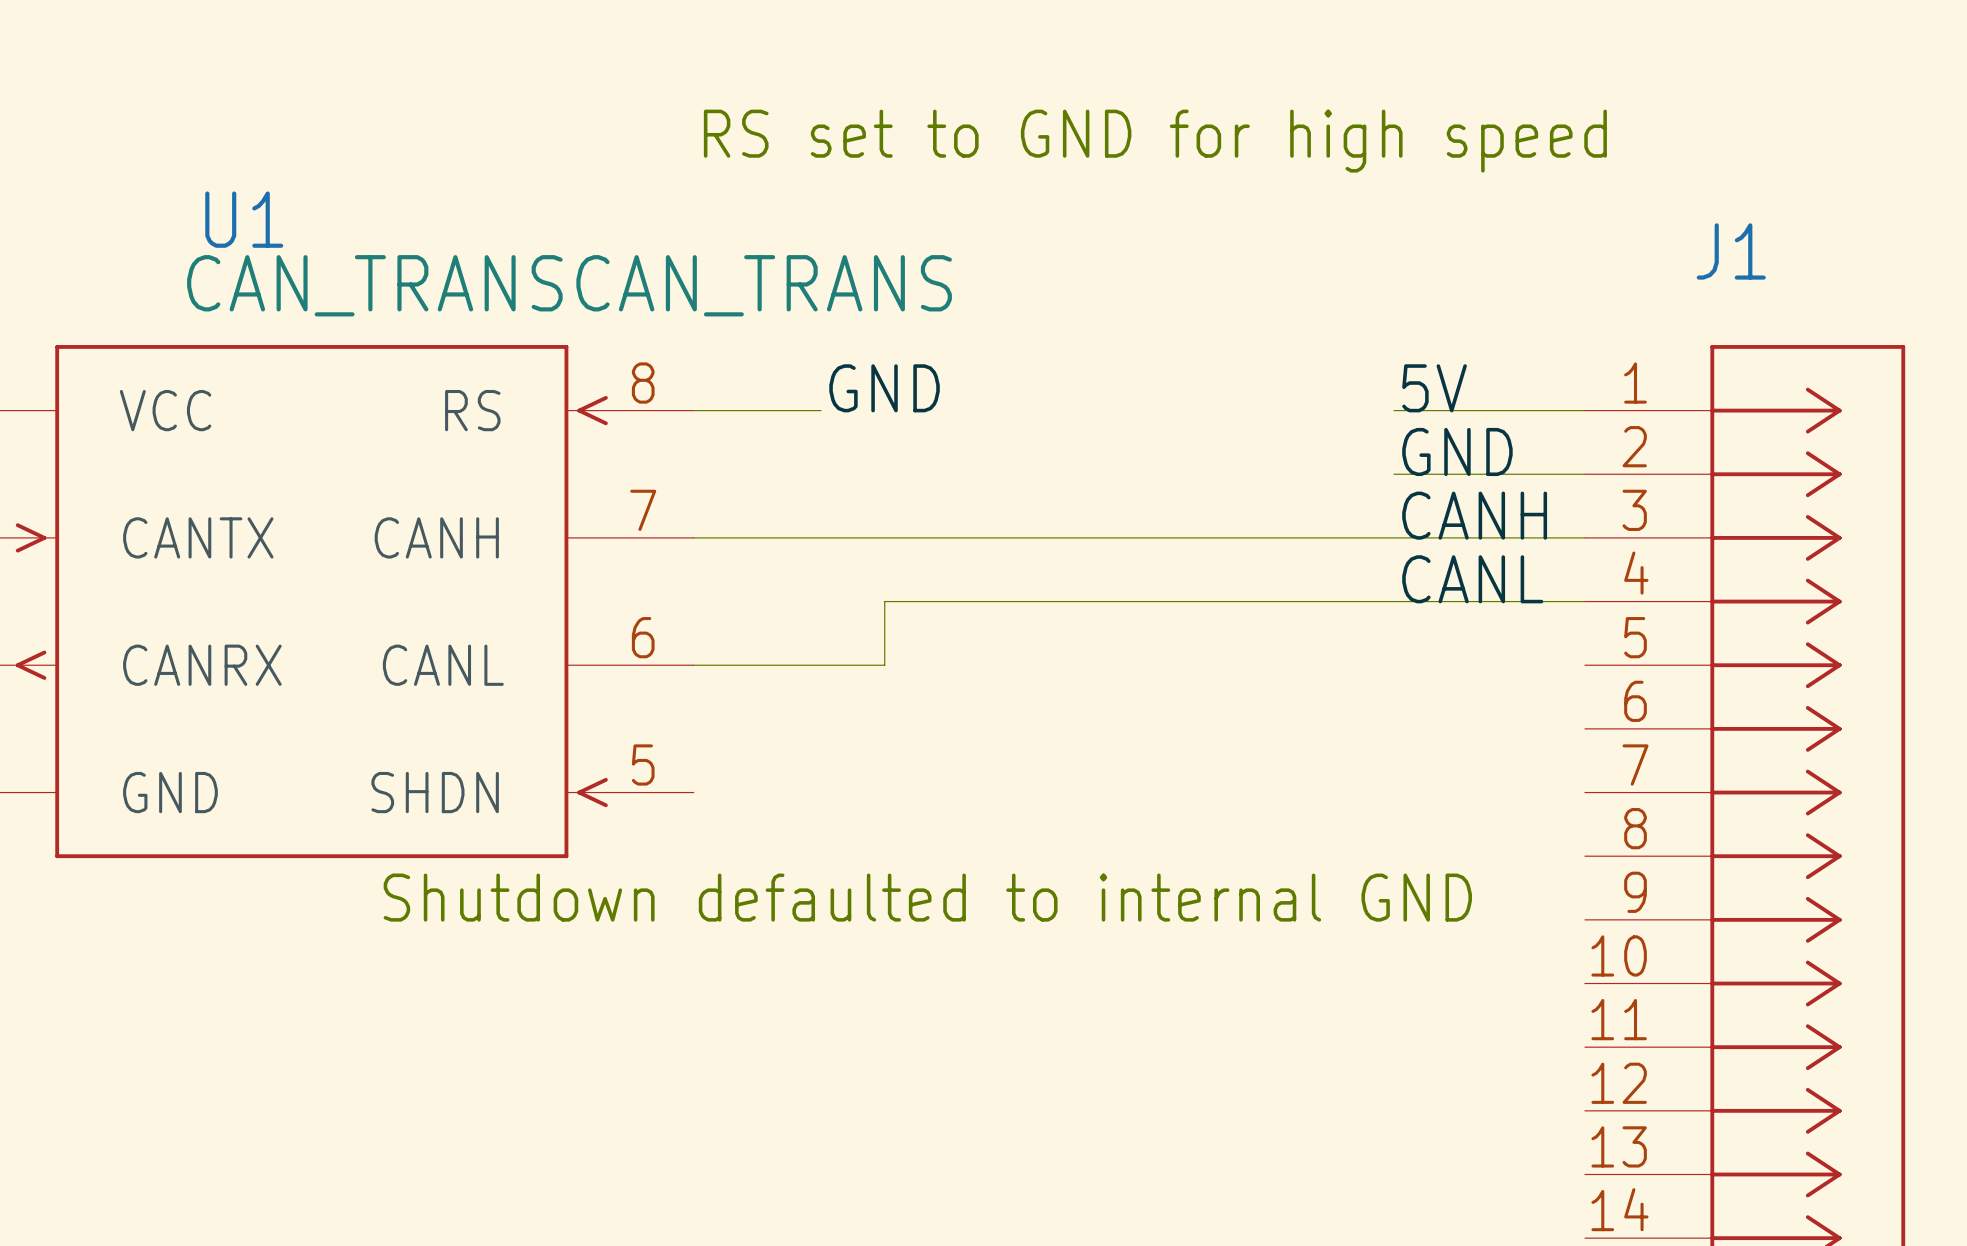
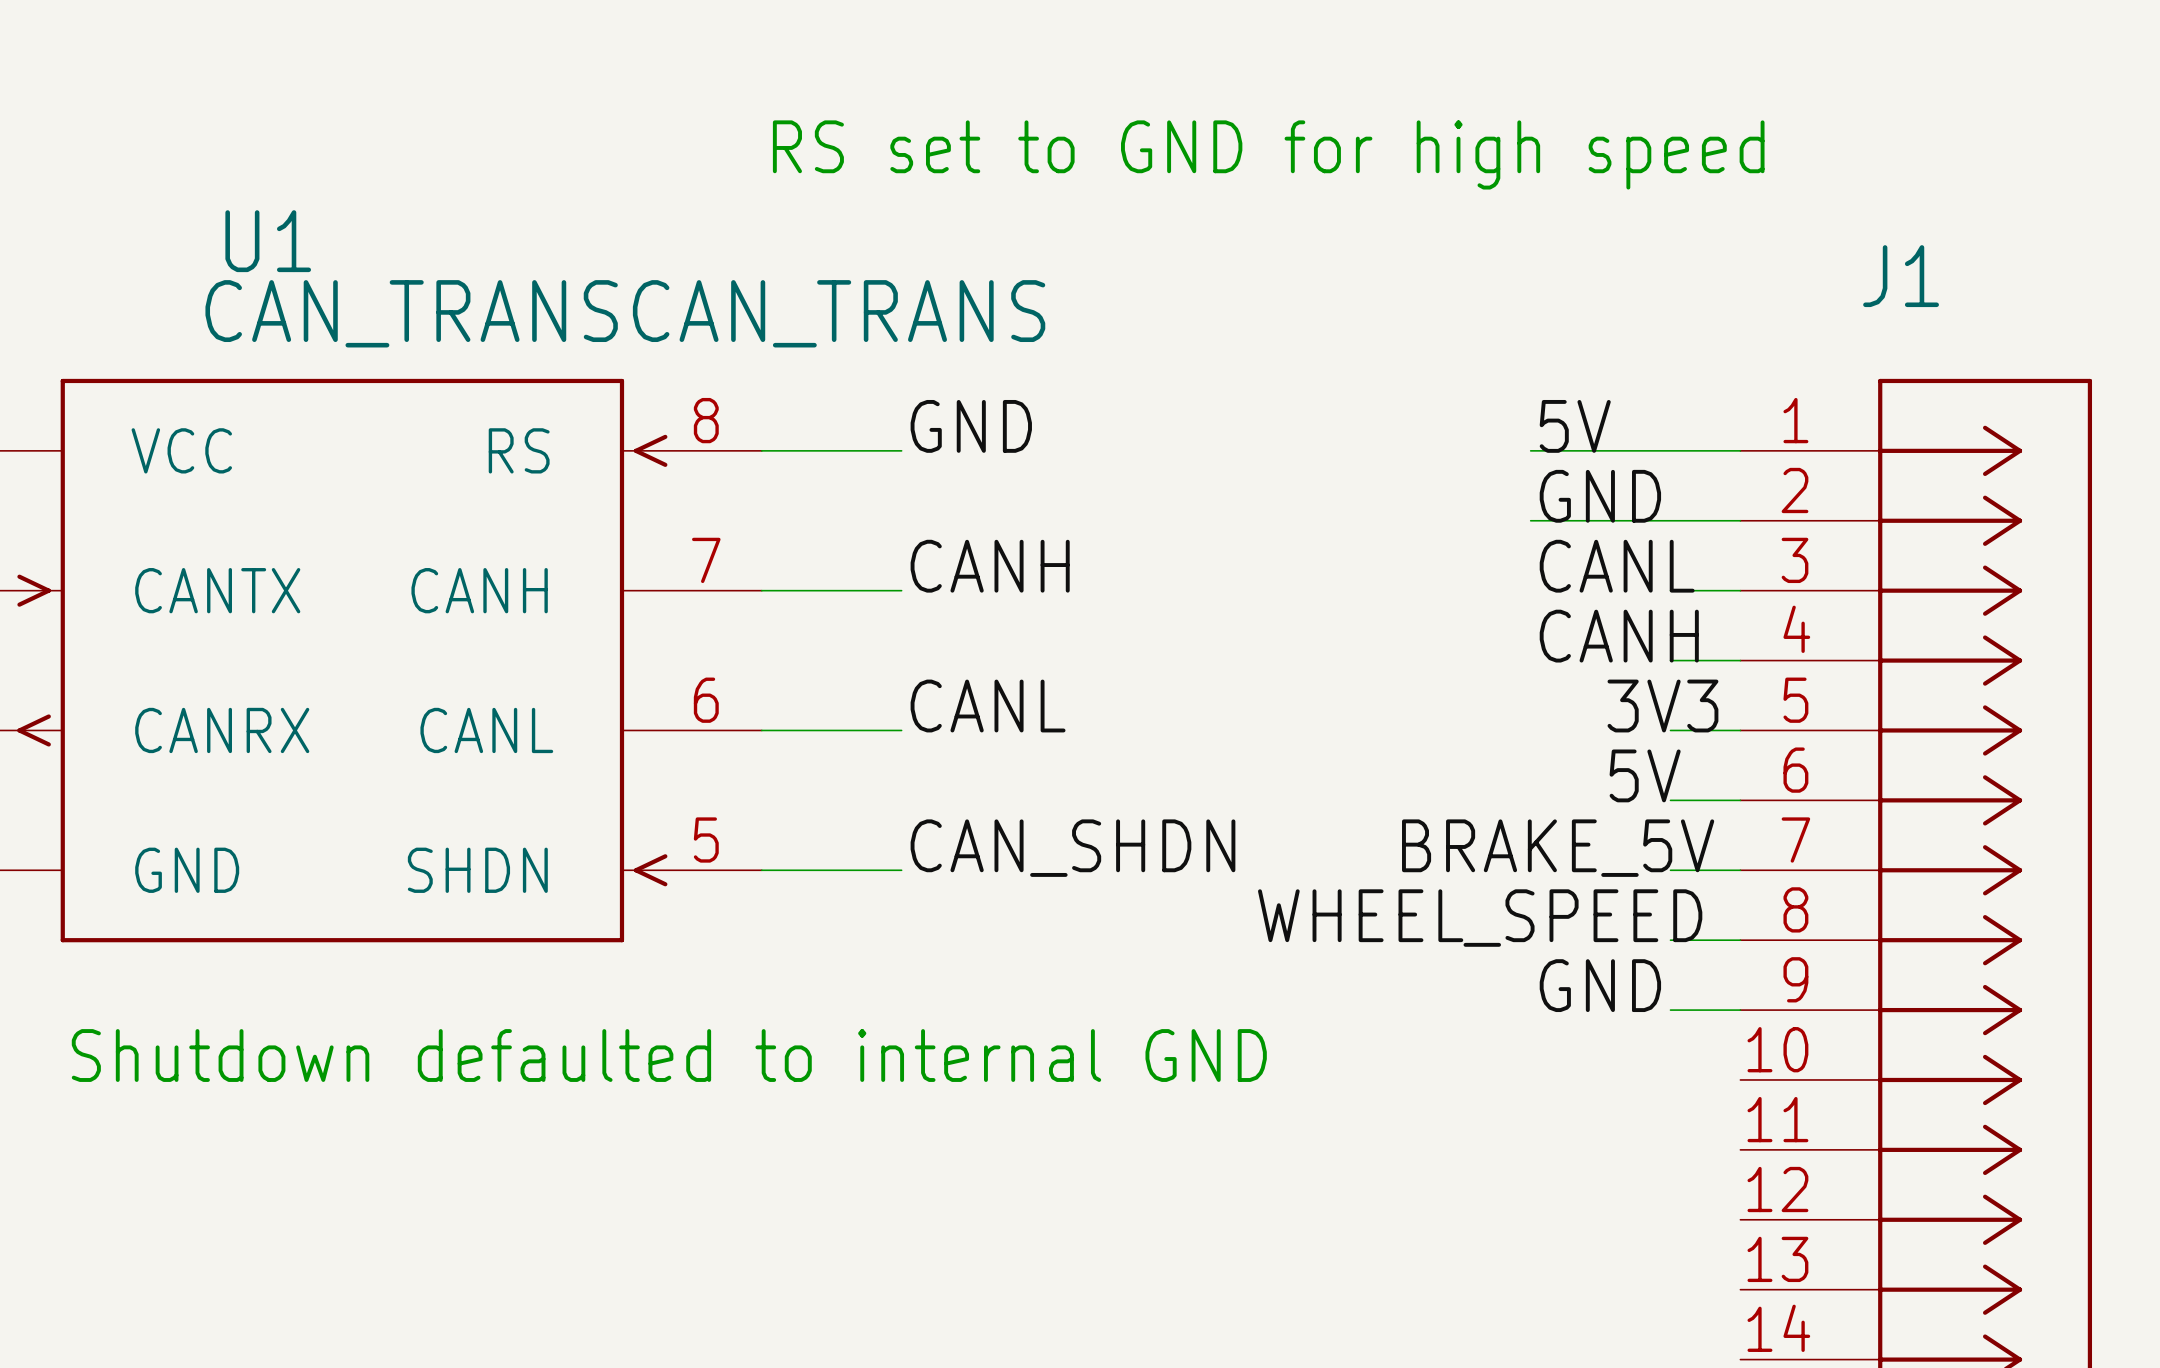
label: none -> CANH (990, 566)
label: CANH (1474, 515) -> CANL (1617, 566)
wire: (821, 537) (1521, 537) -> none
label: CANL (1472, 579) -> CANH (1619, 636)
wire: (1521, 601) (884, 601) (884, 665) (821, 665) -> none
label: none -> CANL (988, 706)
label: none -> 3V3 (1662, 706)
wire: none -> (1670, 730) (1740, 730)
label: none -> 5V (1645, 775)
wire: none -> (1670, 800) (1740, 800)
label: none -> CAN_SHDN (1072, 848)
label: none -> BRAKE_5V (1558, 848)
wire: none -> (761, 870) (901, 870)
wire: none -> (1670, 870) (1740, 870)
label: none -> WHEEL_SPEED (1480, 918)
wire: none -> (1670, 940) (1740, 940)
text position: Shutdown defaulted to internal GND (927, 897) -> Shutdown defaulted to internal GND (669, 1055)
label: none -> GND (1600, 985)
wire: none -> (1670, 1010) (1740, 1010)

